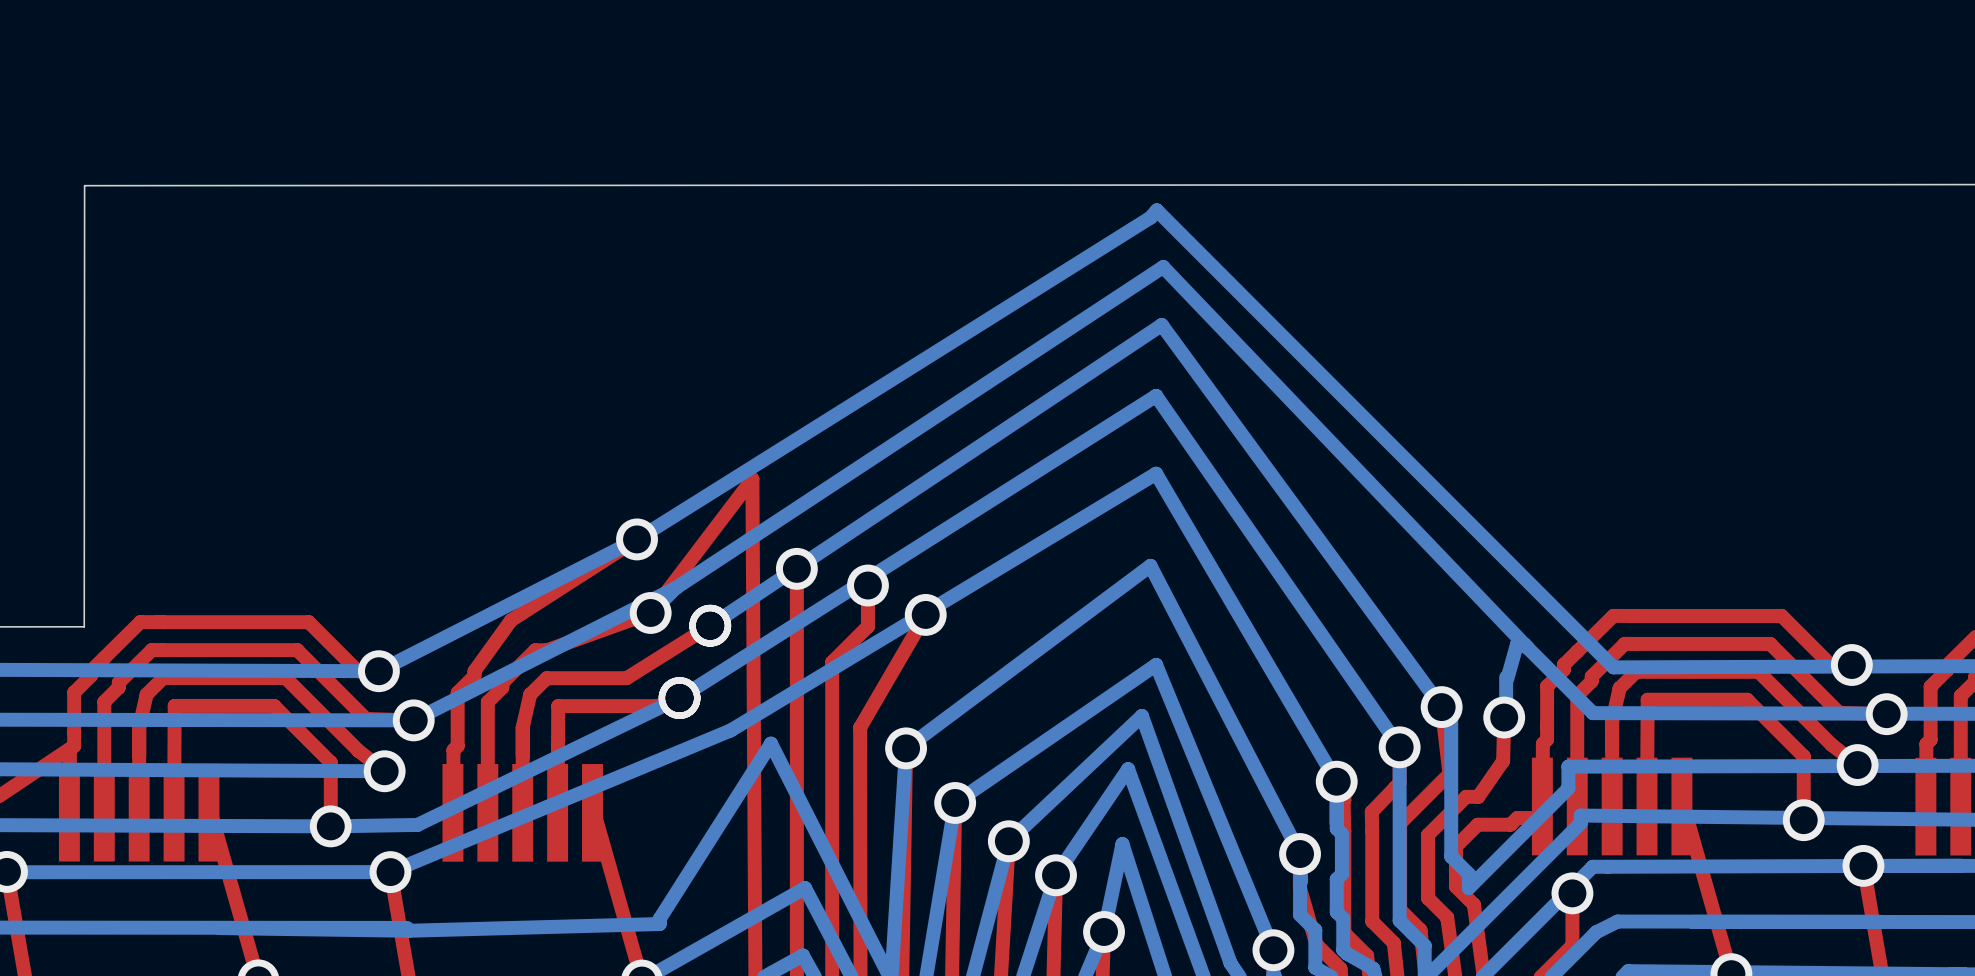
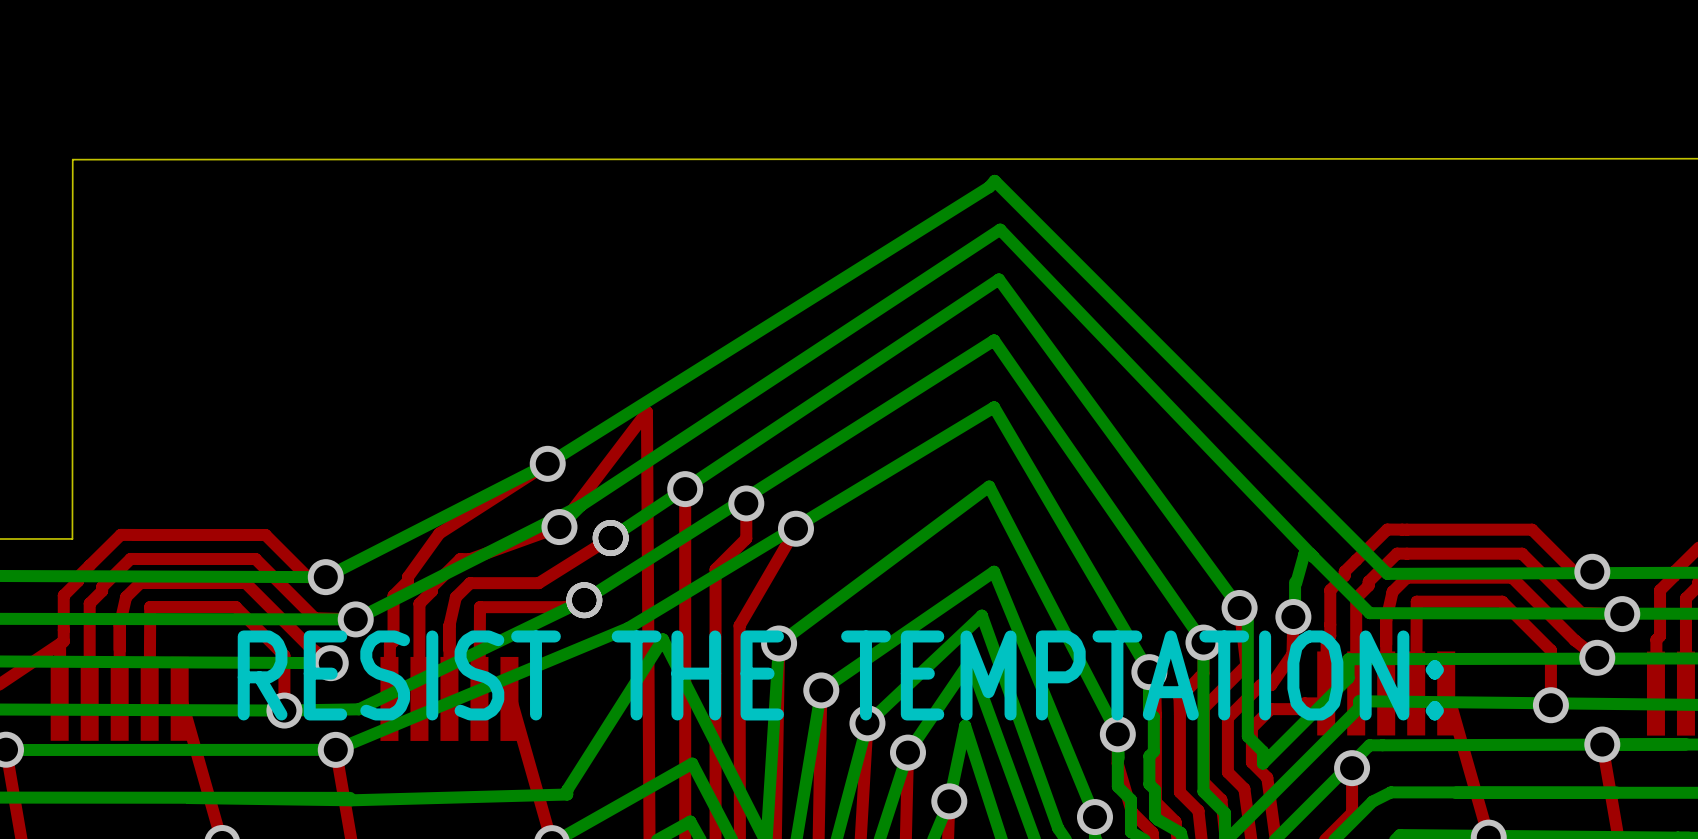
text: none -> RESIST THE TEMPTATION: (840, 675)

